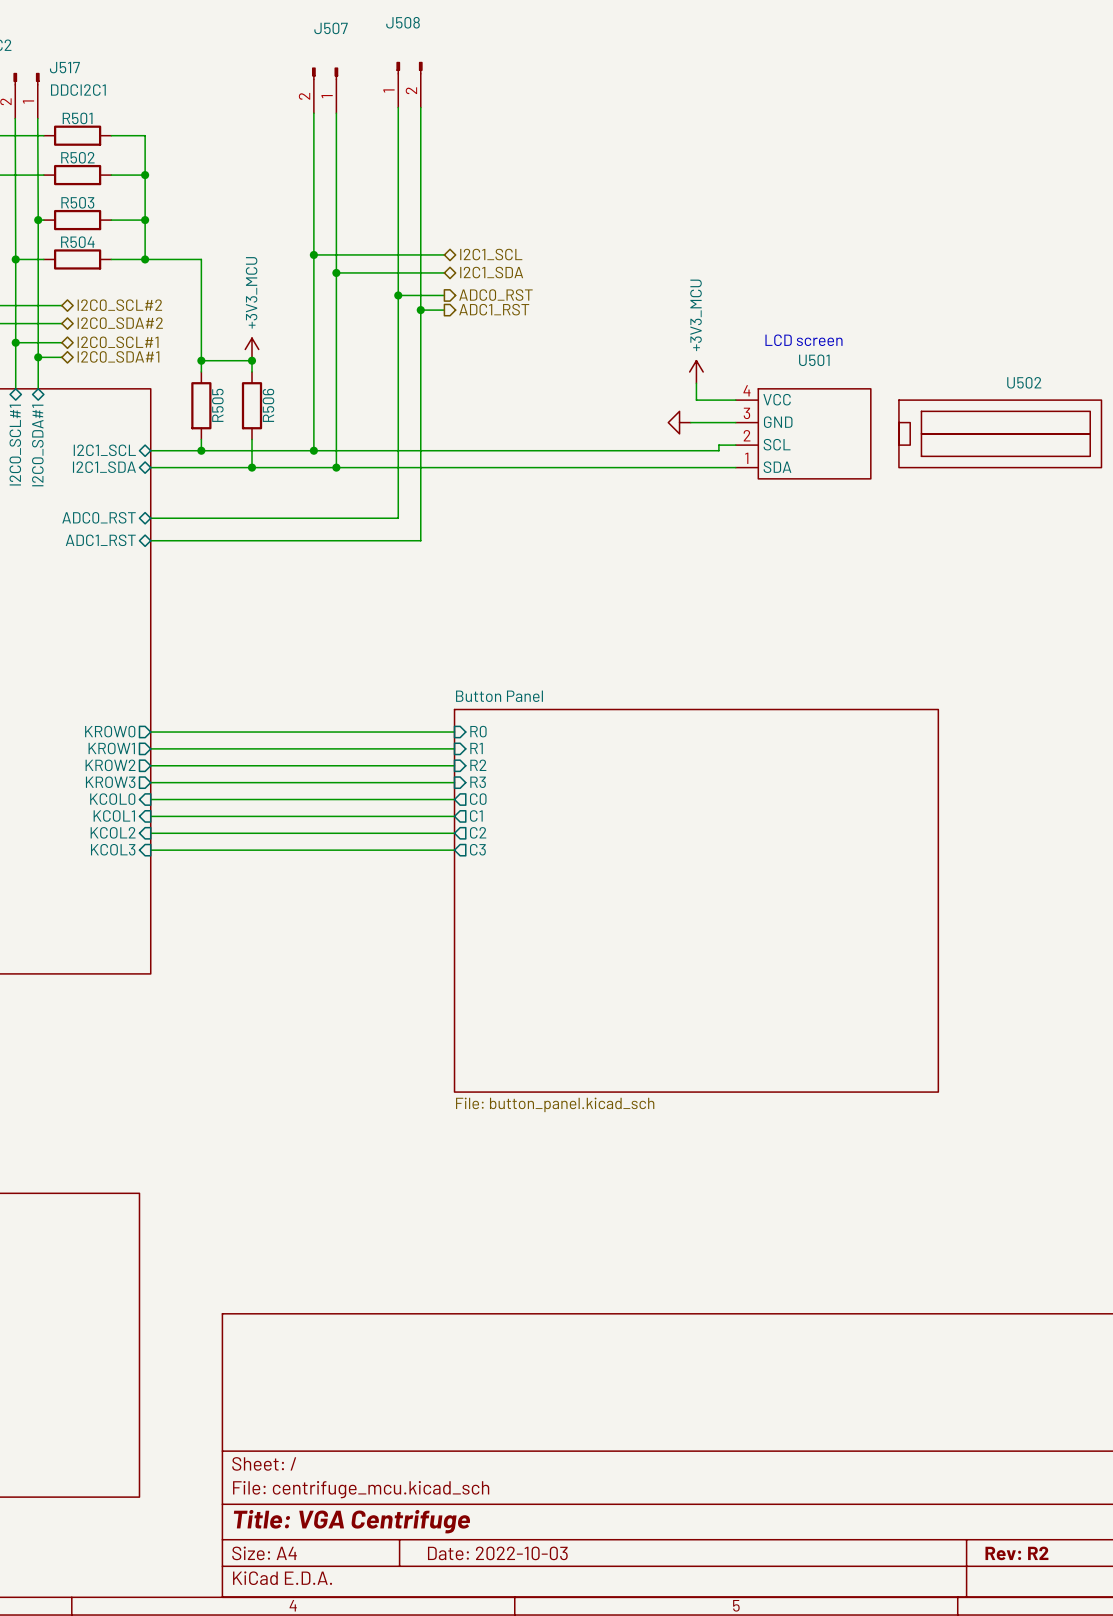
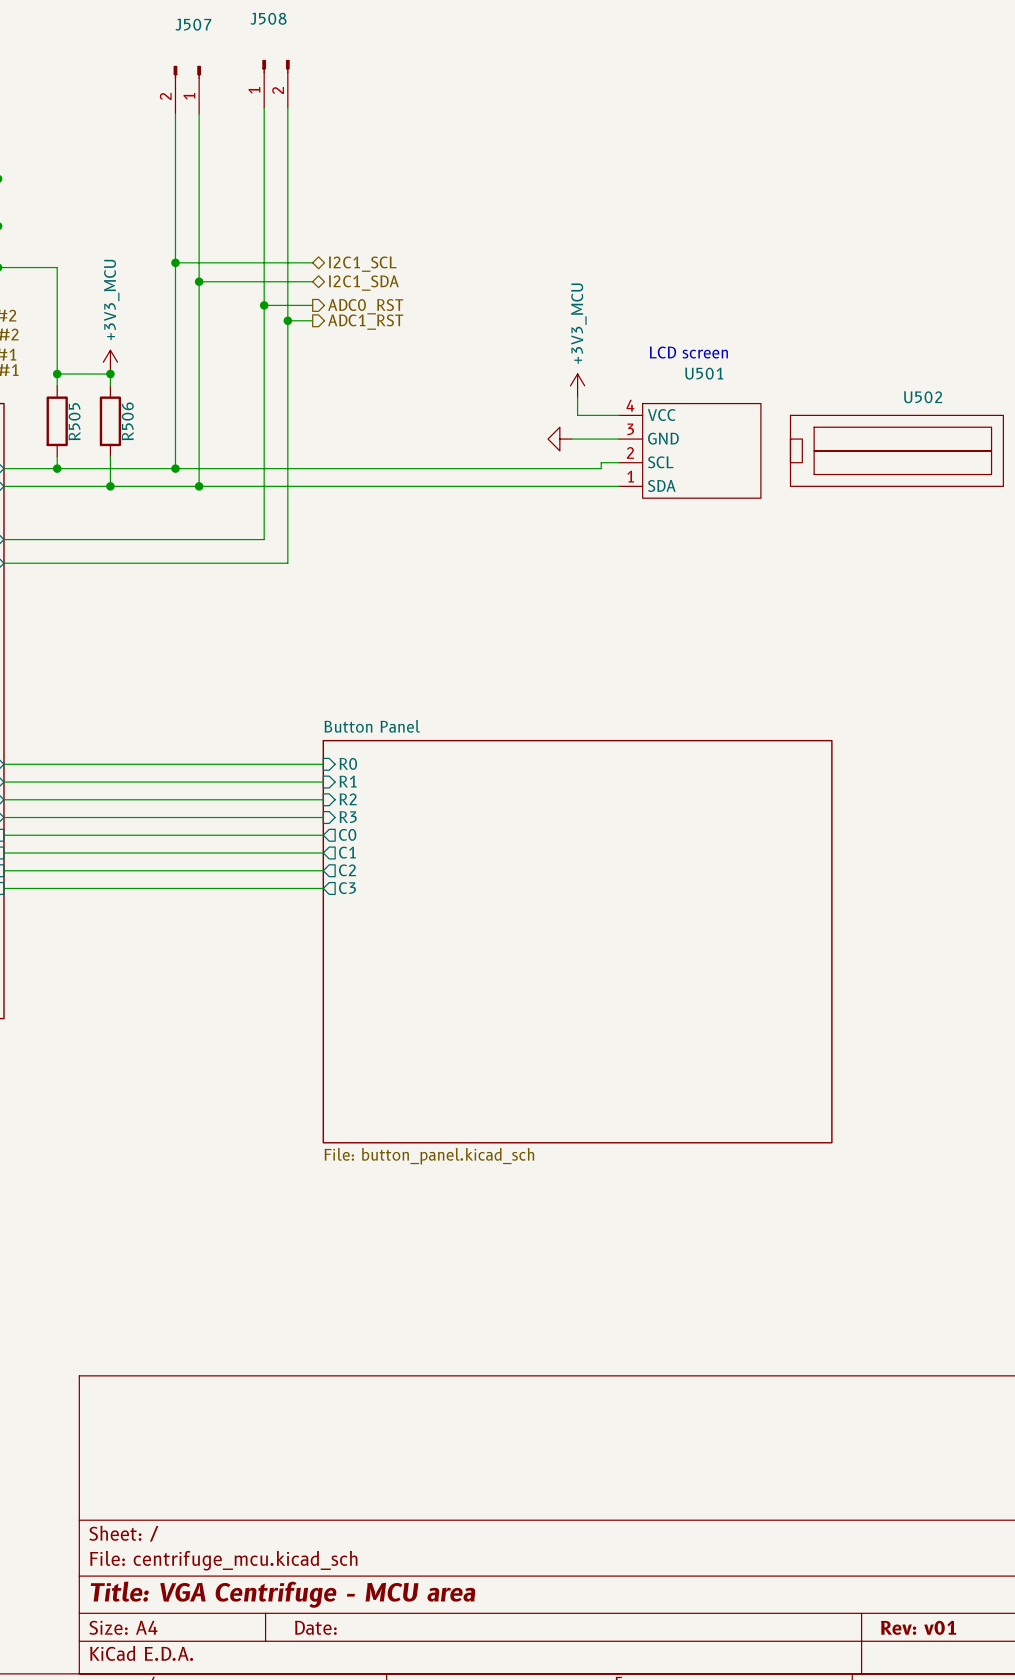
title block: Title: VGA Centrifuge (351, 1521) -> Title: VGA Centrifuge - MCU area (283, 1594)
title block: Date: 2022-10-03 (497, 1553) -> Date: (315, 1627)
title block: Rev: R2 (1016, 1553) -> Rev: v01 (918, 1627)

